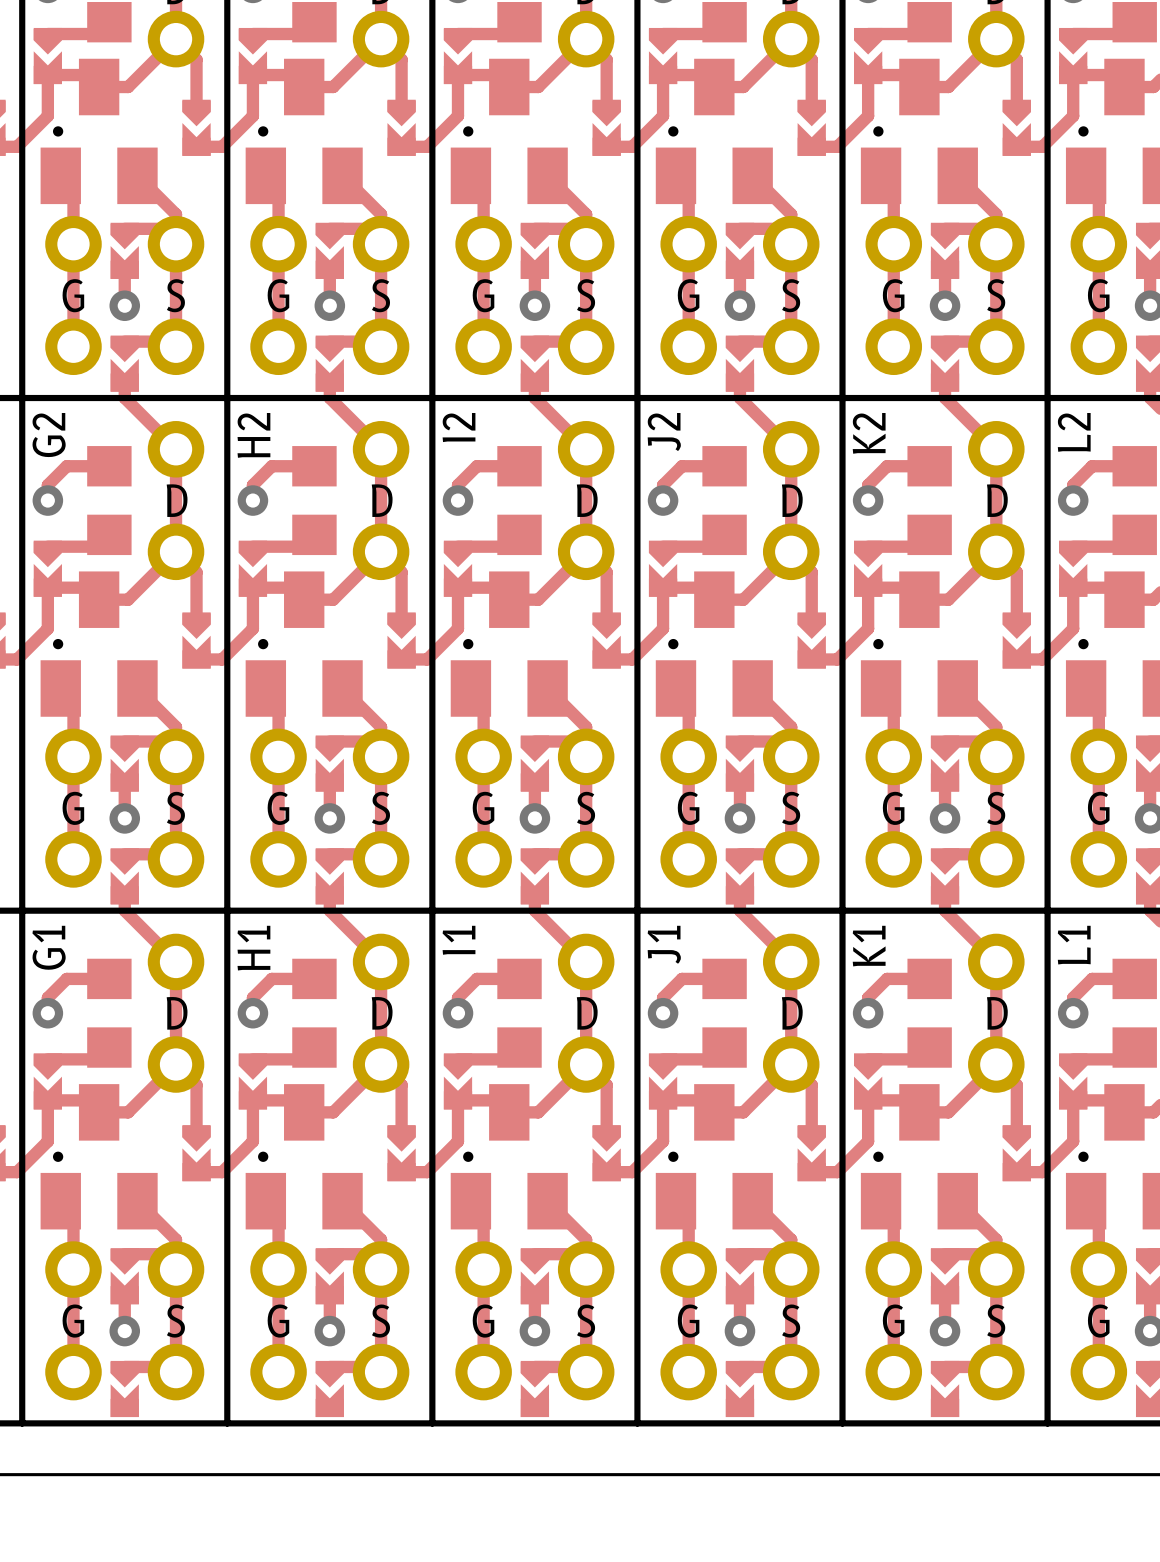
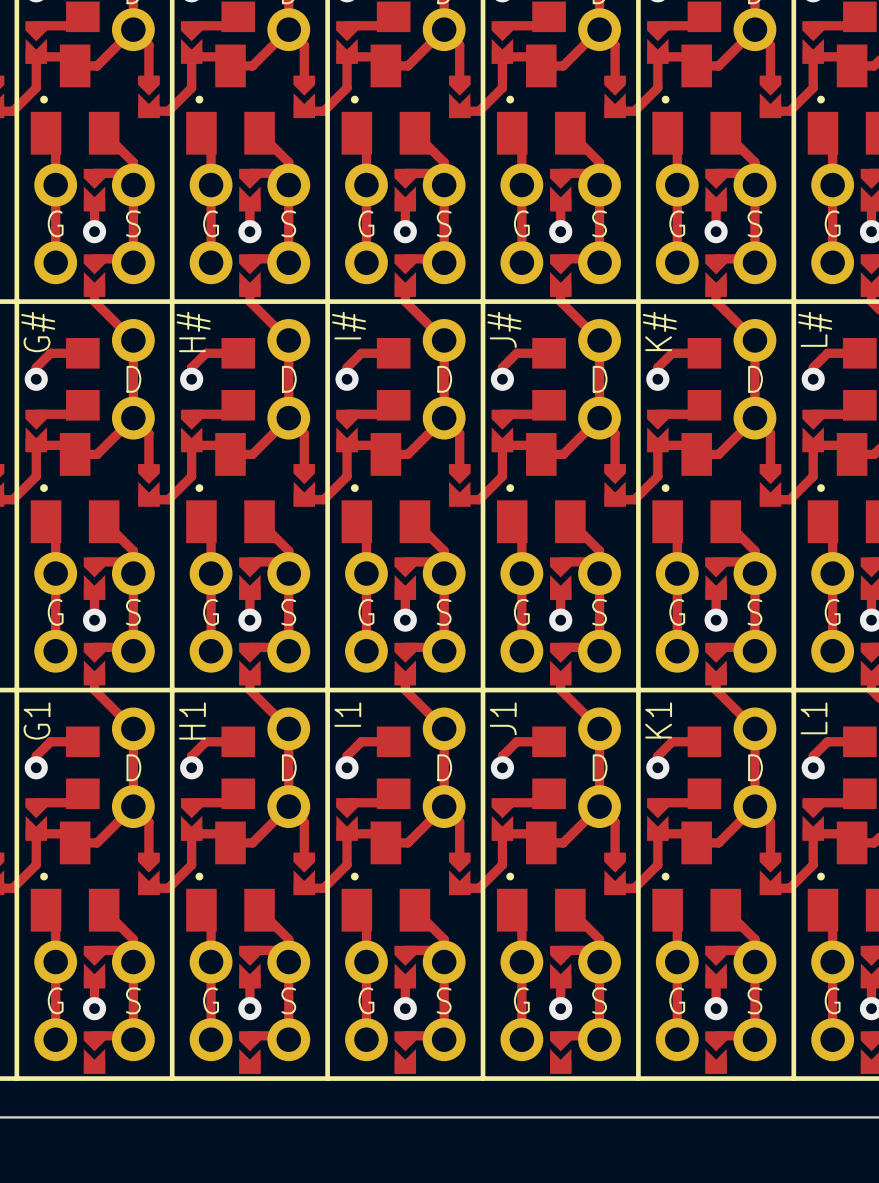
text: I2 (459, 427) -> I# (349, 325)
text: J2 (664, 432) -> J# (504, 329)
text: L2 (1074, 432) -> L# (815, 329)
text: K2 (869, 433) -> K# (659, 331)
text: G2 (49, 435) -> G# (38, 331)
text: H2 (253, 435) -> H# (193, 331)

